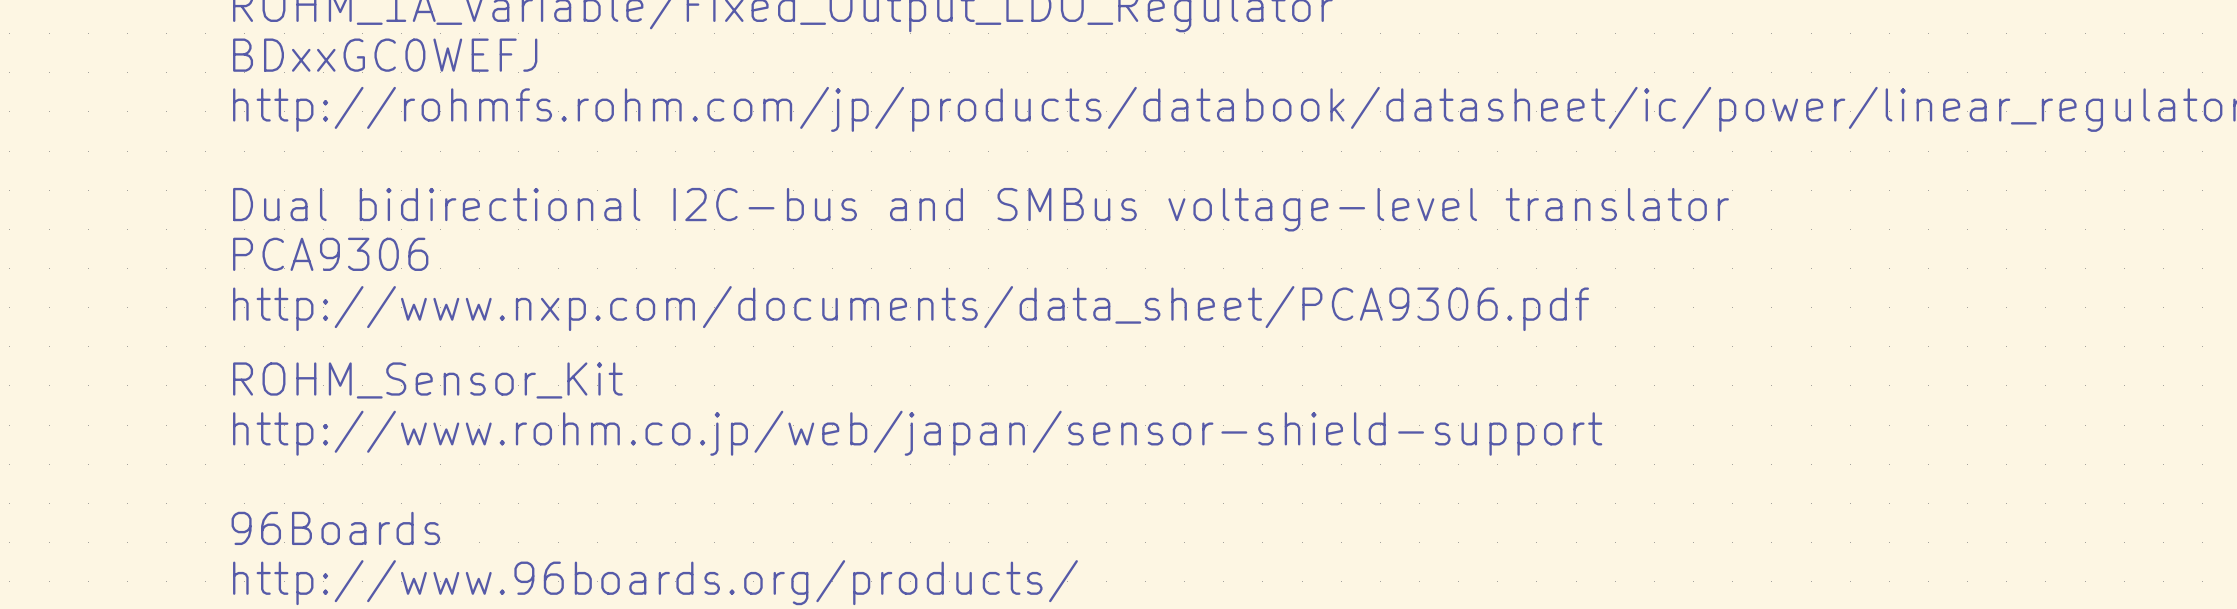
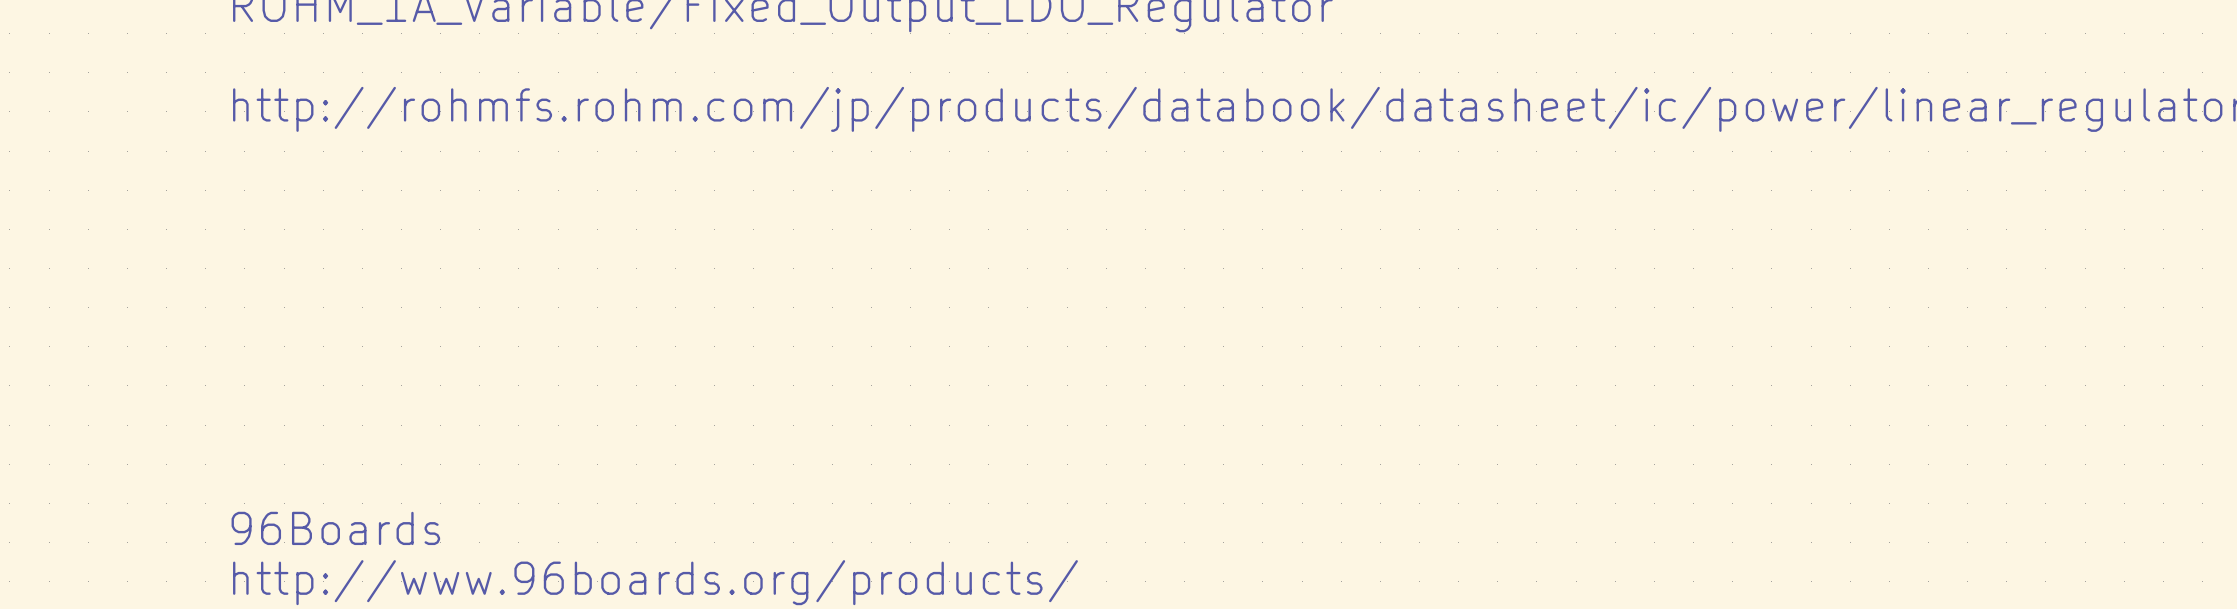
text: BDxxGC0WEFJ (385, 55) -> none
text: Dual bidirectional I2C-bus and SMBus voltage-level translator (980, 209) -> none
text: PCA9306 (330, 254) -> none
text: http://www.nxp.com/documents/data_sheet/PCA9306.pdf (911, 308) -> none
text: ROHM_Sensor_Kit (427, 380) -> none
text: http://www.rohm.co.jp/web/japan/sensor-shield-support (917, 433) -> none

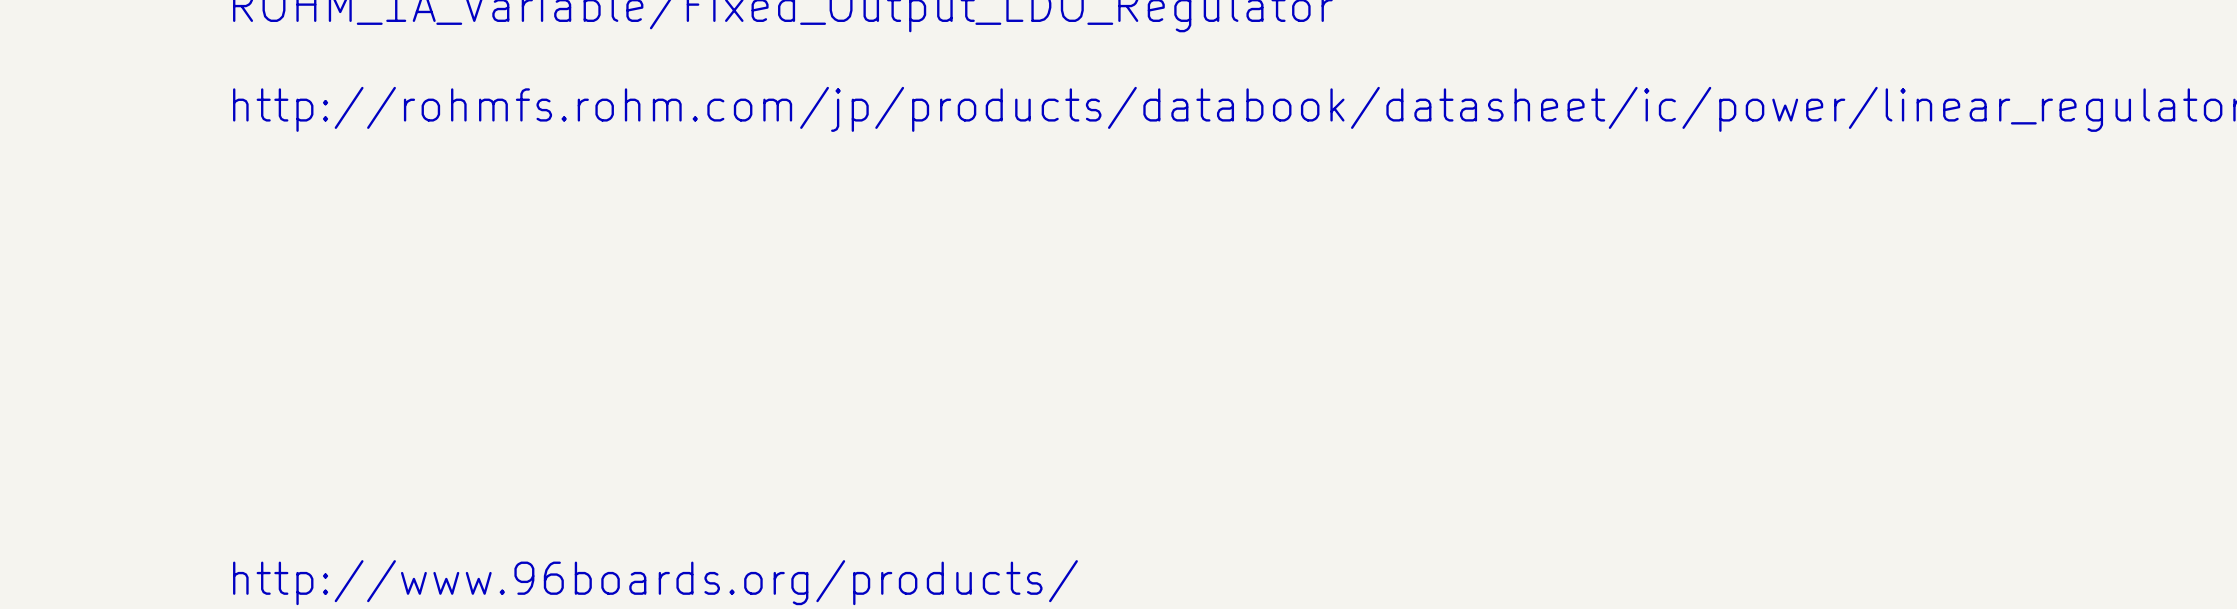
text: 96Boards (335, 528) -> none

